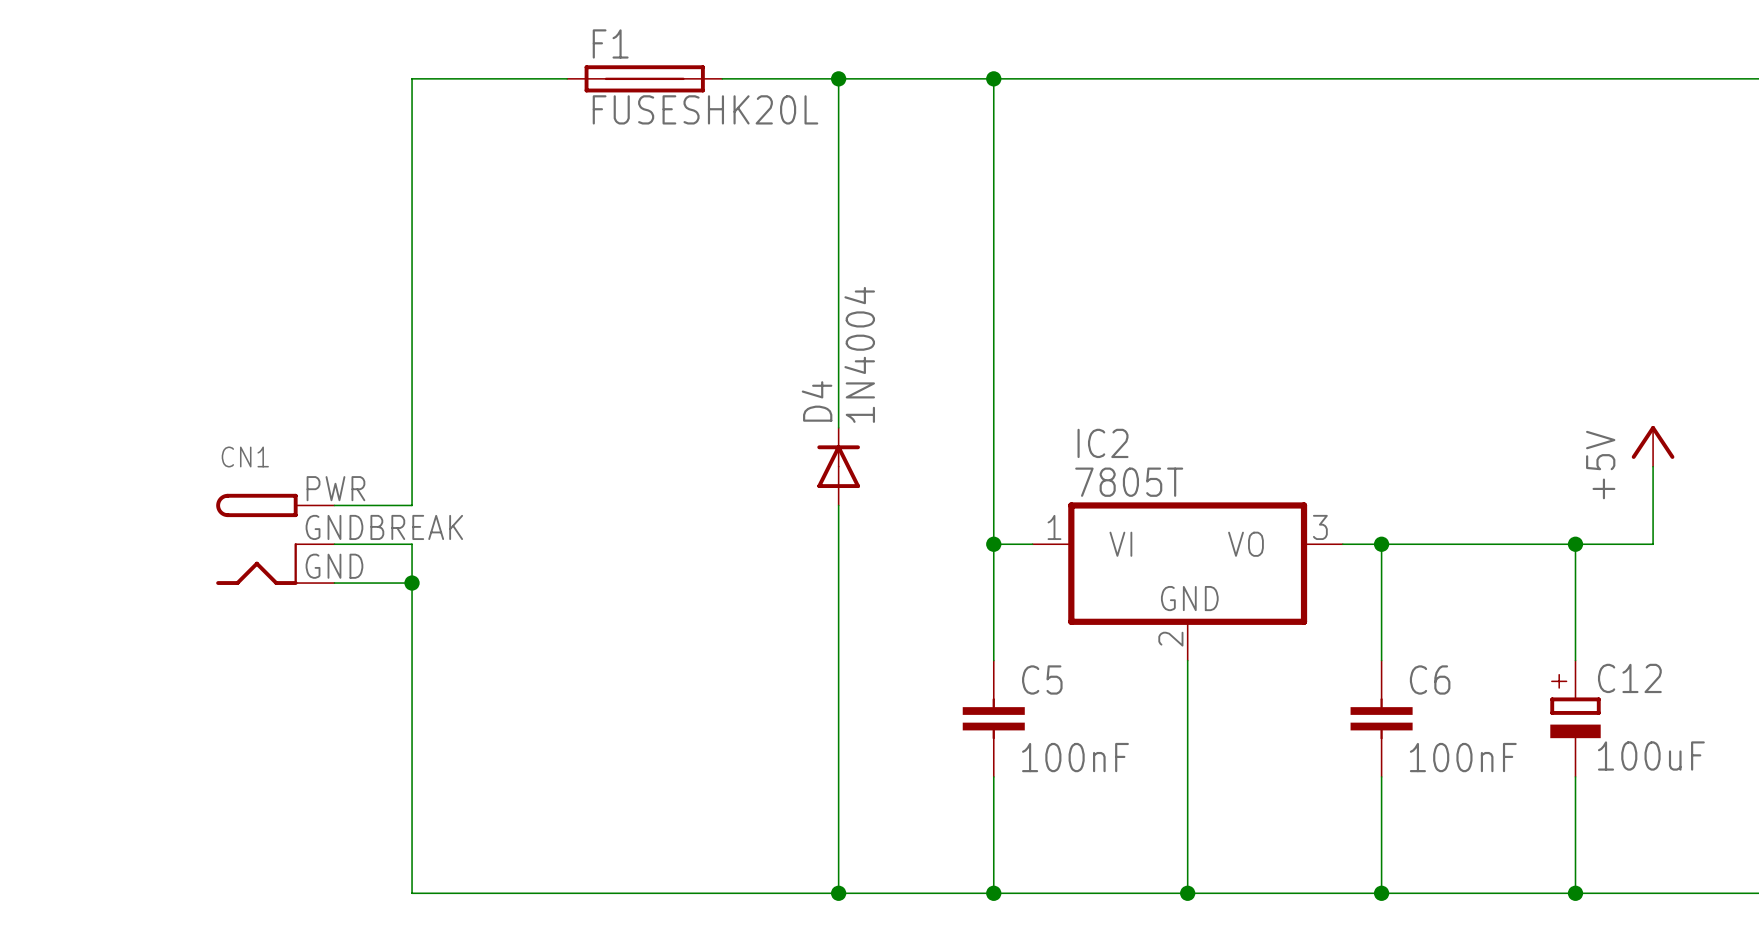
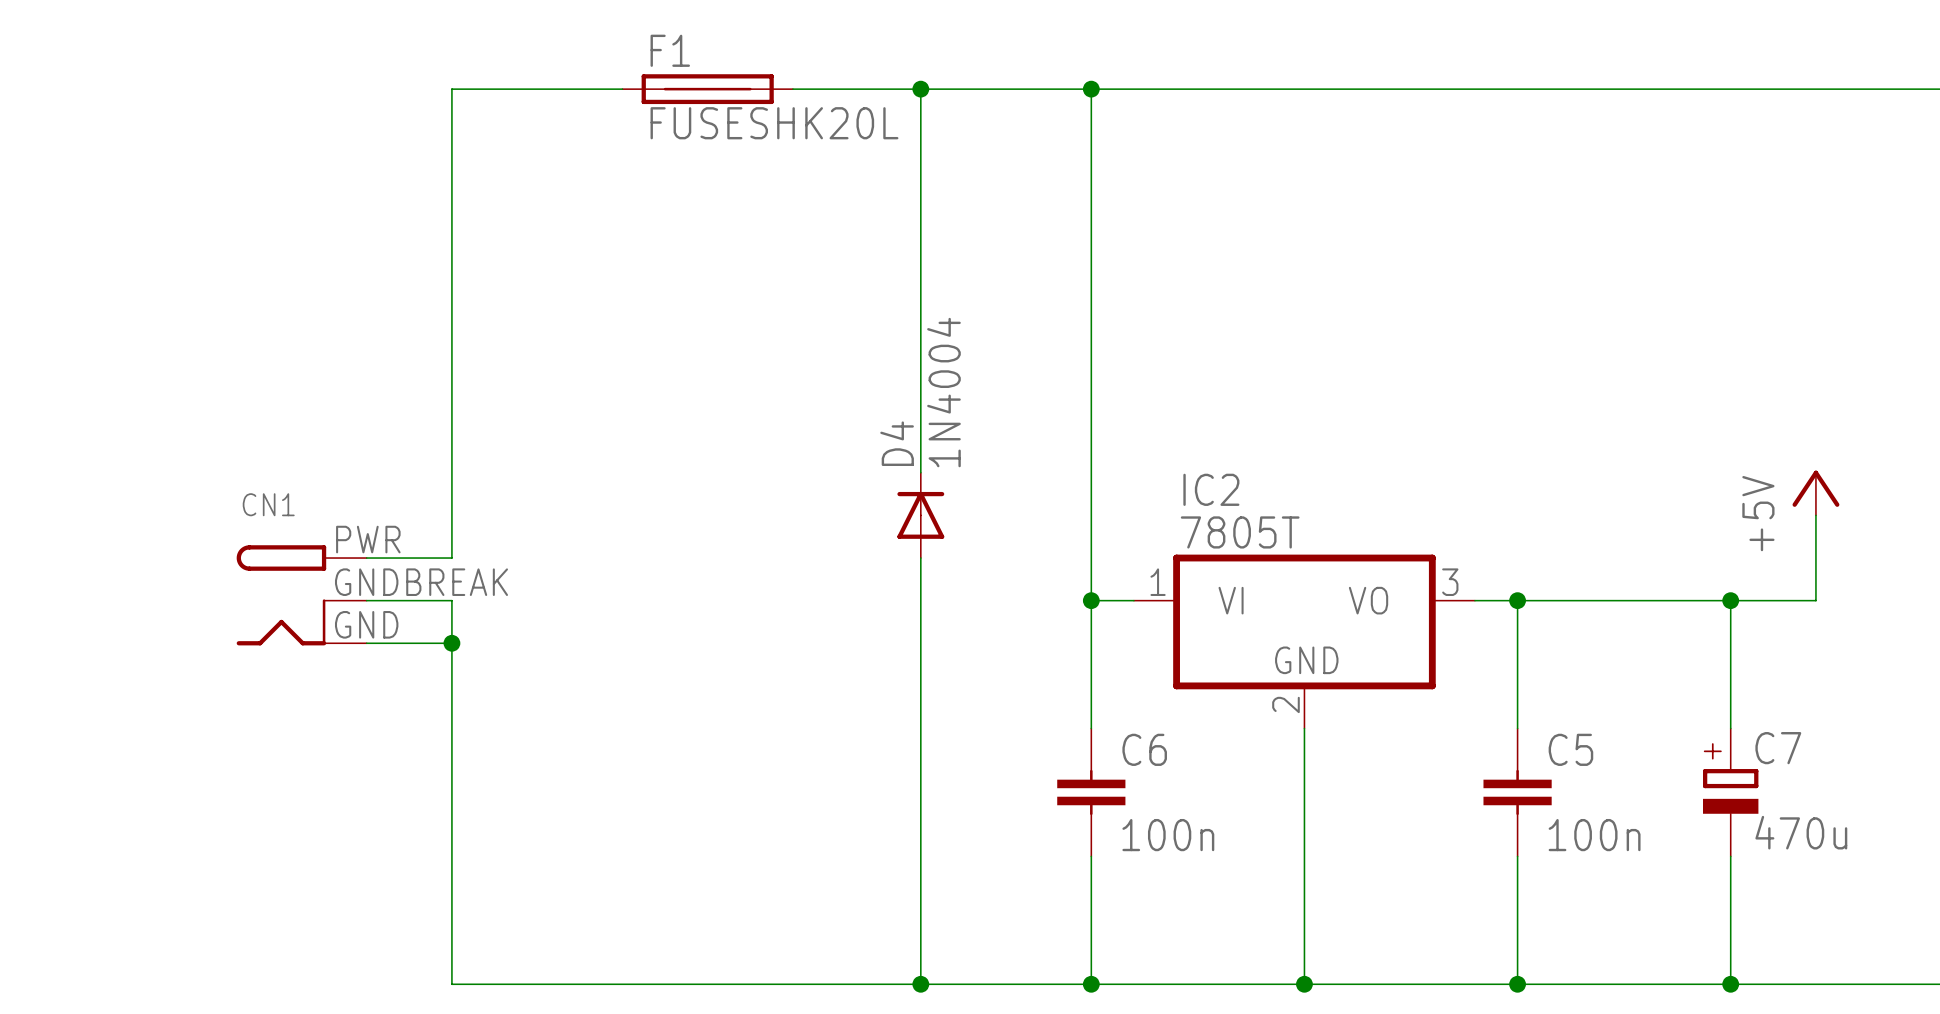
C12 name: C12 (1629, 678) -> C7 (1778, 748)
C5 name: C5 (1042, 679) -> C6 (1144, 749)
C6 name: C6 (1430, 679) -> C5 (1570, 749)
C12 value: 100uF (1651, 756) -> 470u (1801, 832)
C5 value: 100nF (1075, 757) -> 100n (1168, 835)
C6 value: 100nF (1463, 757) -> 100n (1594, 835)

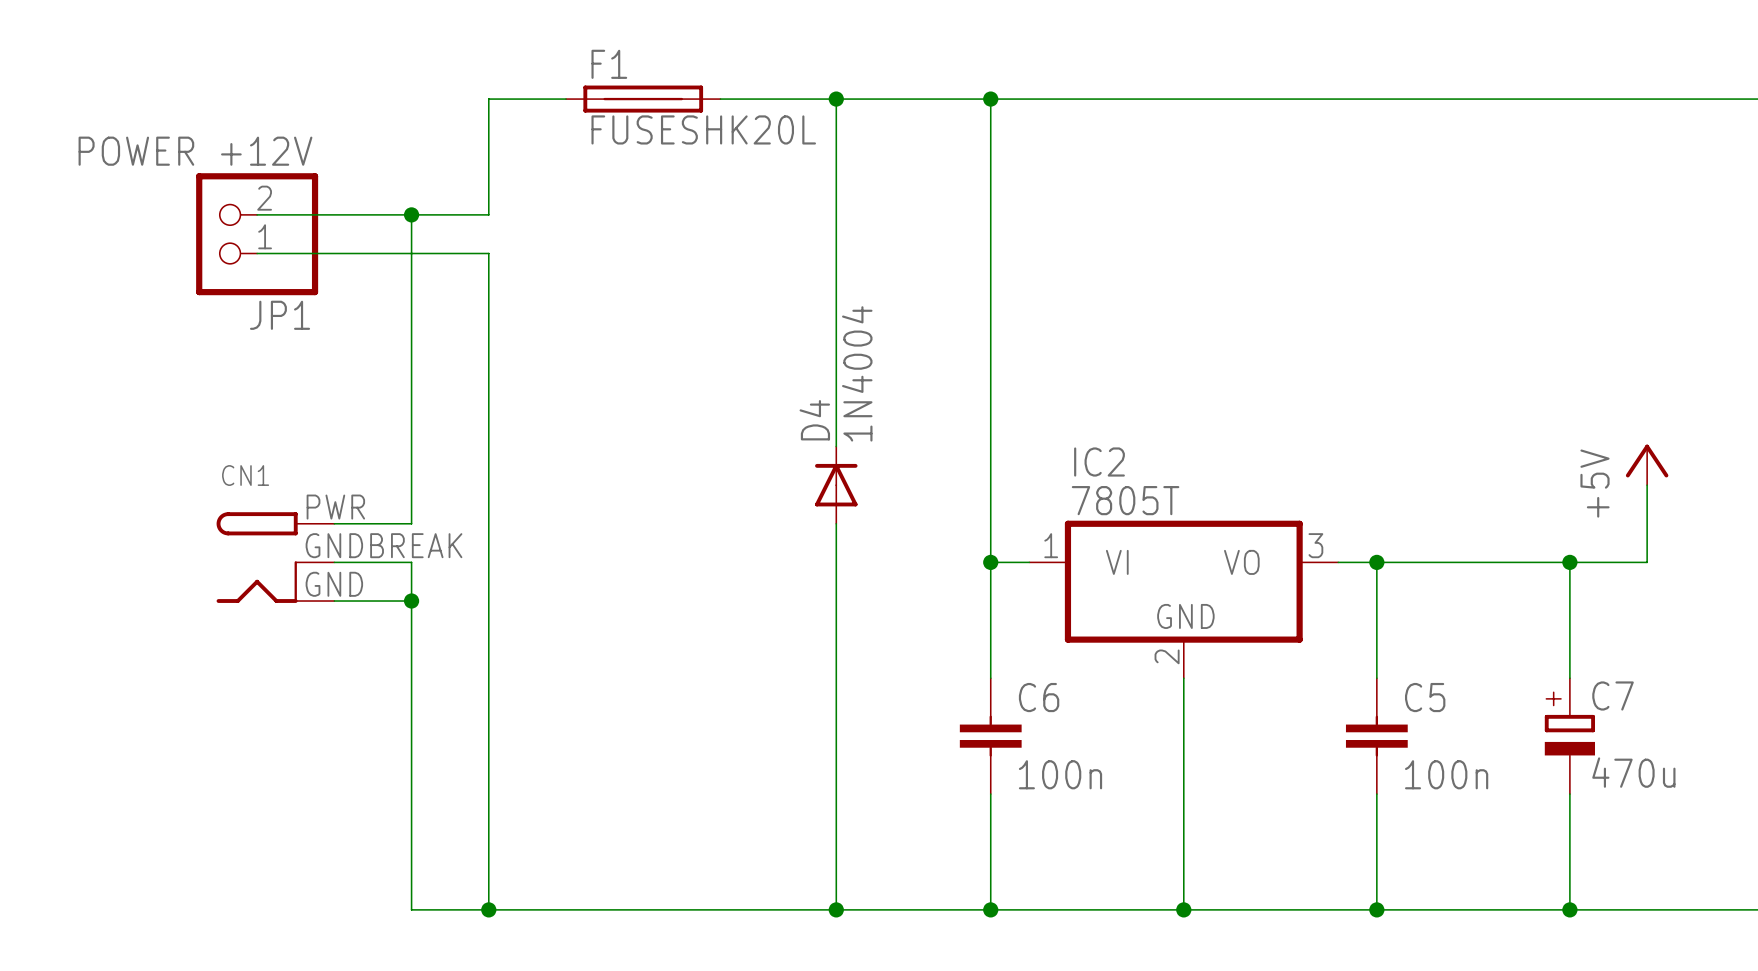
wire: (537, 89) (451, 89) (451, 217) -> (488, 99) (488, 214) (257, 214)
junction: none -> (411, 214)
JP1: none -> POWER +12V (257, 234)
wire: none -> (257, 253) (488, 253) (488, 909)
junction: none -> (488, 909)

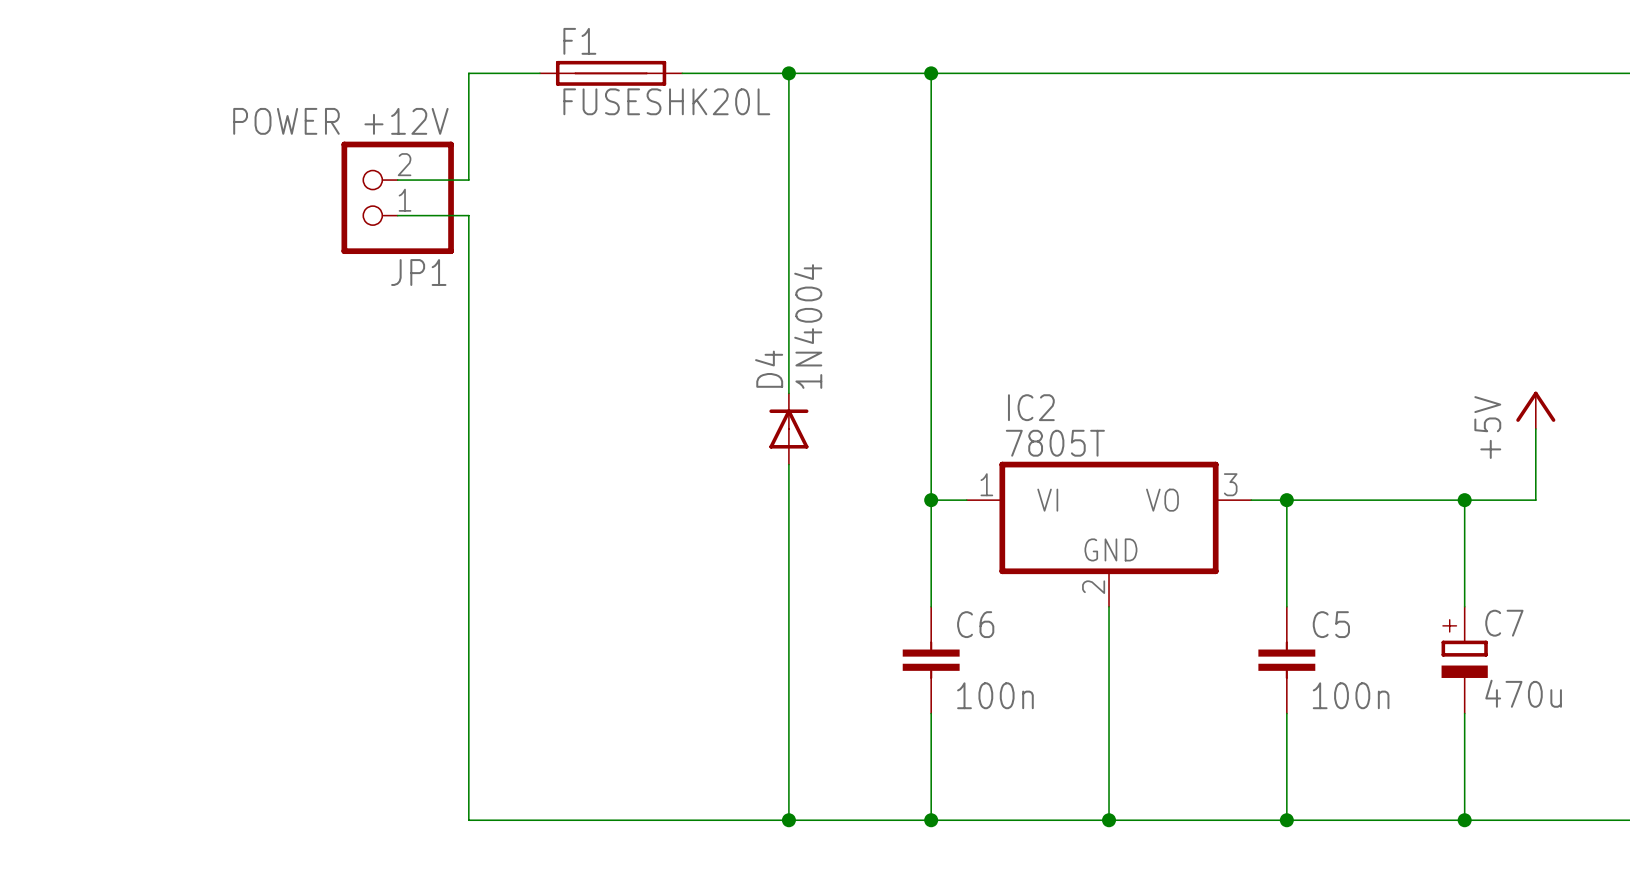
wire: (257, 214) (411, 214) (411, 523) (334, 523) -> none
junction: (411, 214) -> none
JP1 position: (257, 234) -> (397, 197)
wire: (257, 253) (411, 253) -> none
CN1: (275, 557) -> none
wire: (334, 562) (411, 562) (411, 909) (488, 909) -> none
wire: (334, 601) (411, 601) -> none
junction: (411, 601) -> none
junction: (488, 909) -> none

